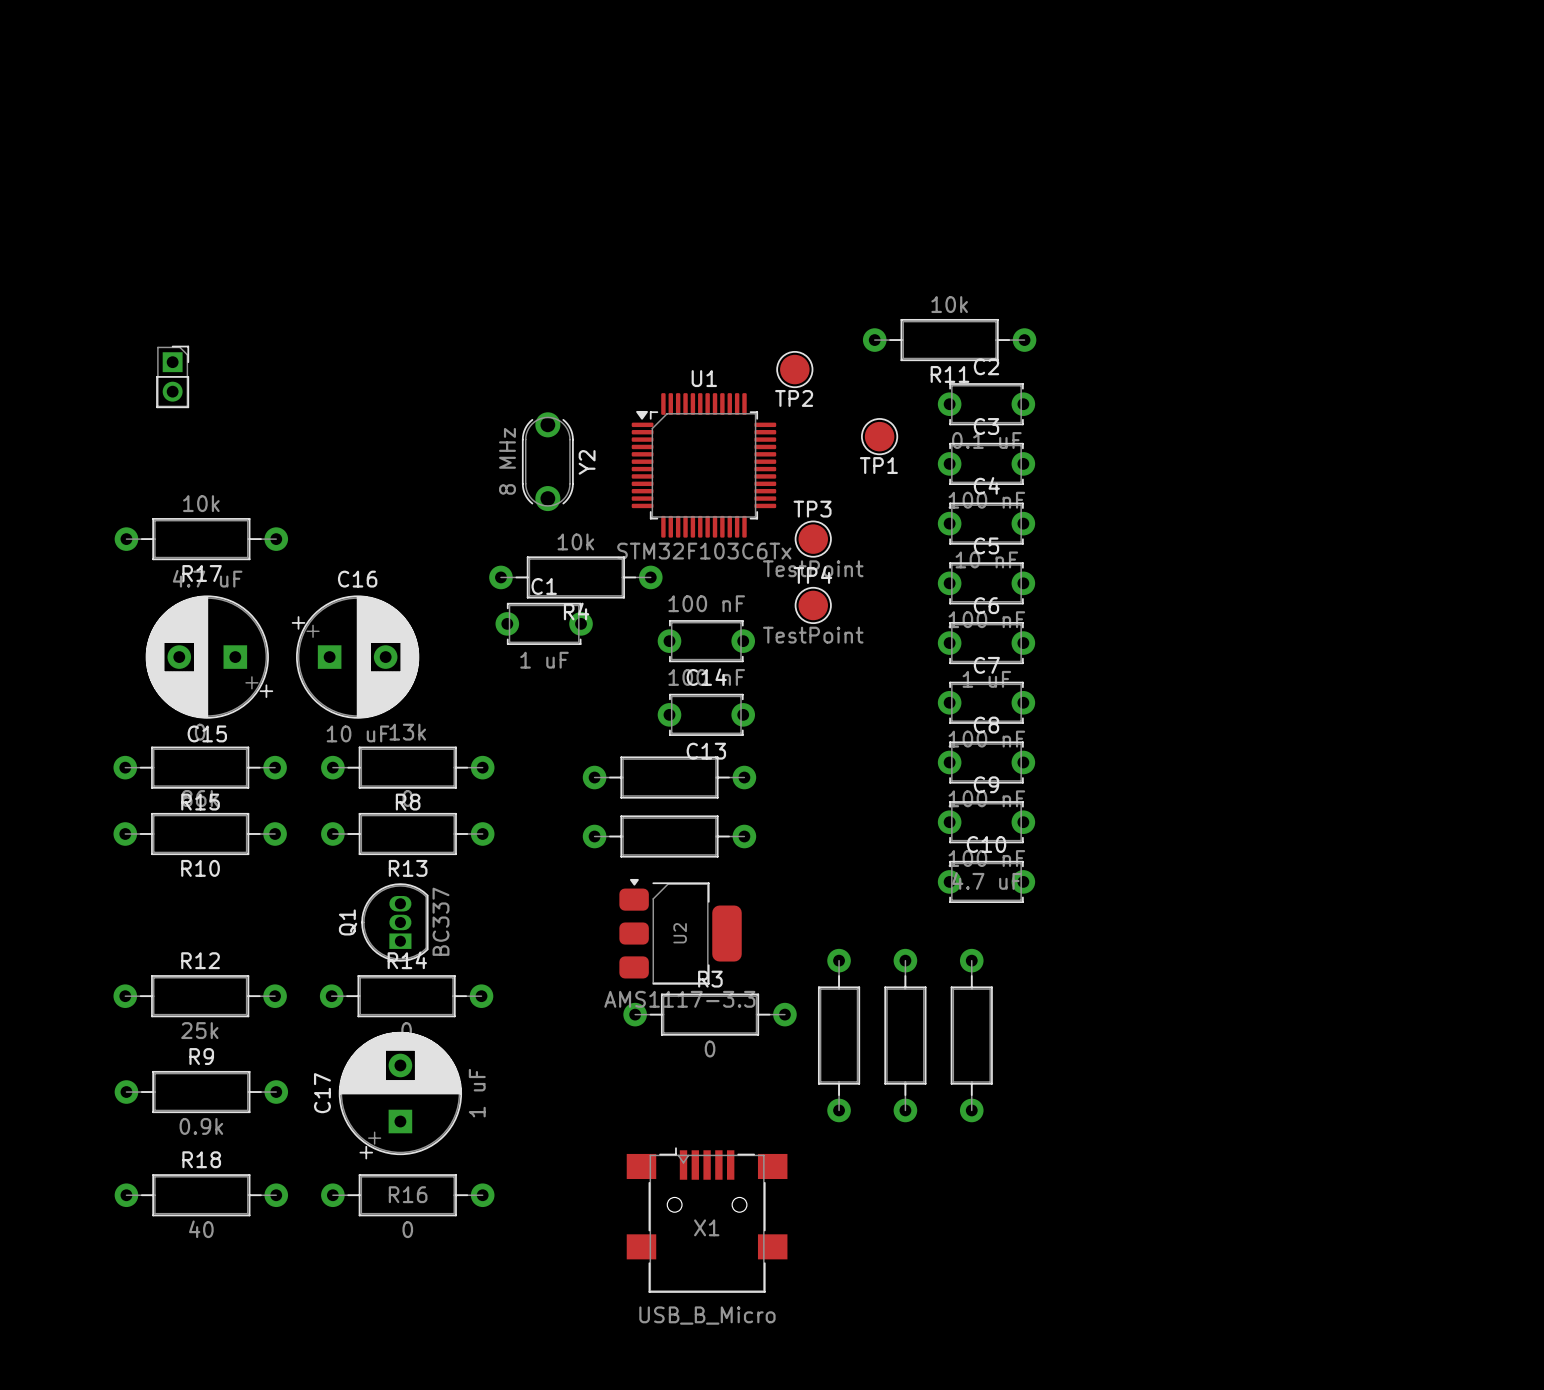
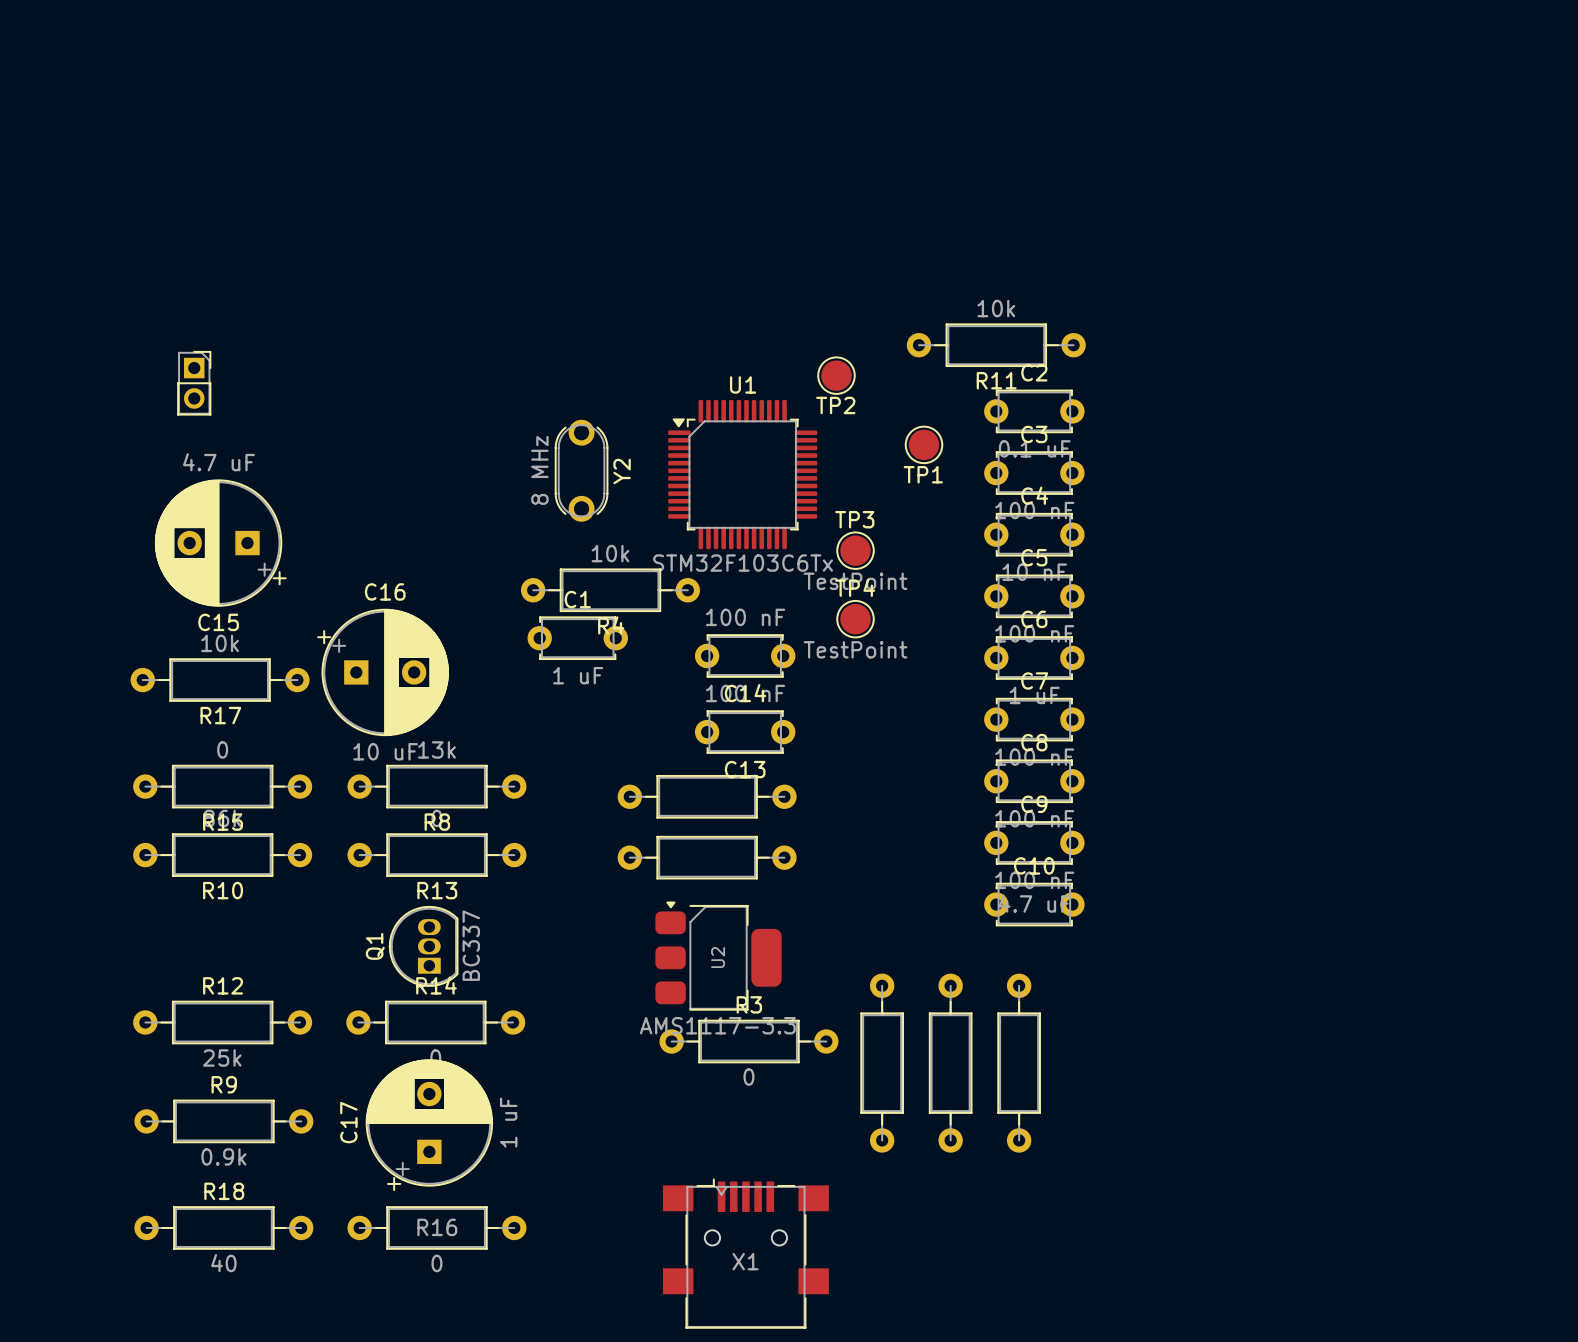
R17 position: (201, 539) -> (220, 680)
C15 position: (209, 657) -> (220, 543)

